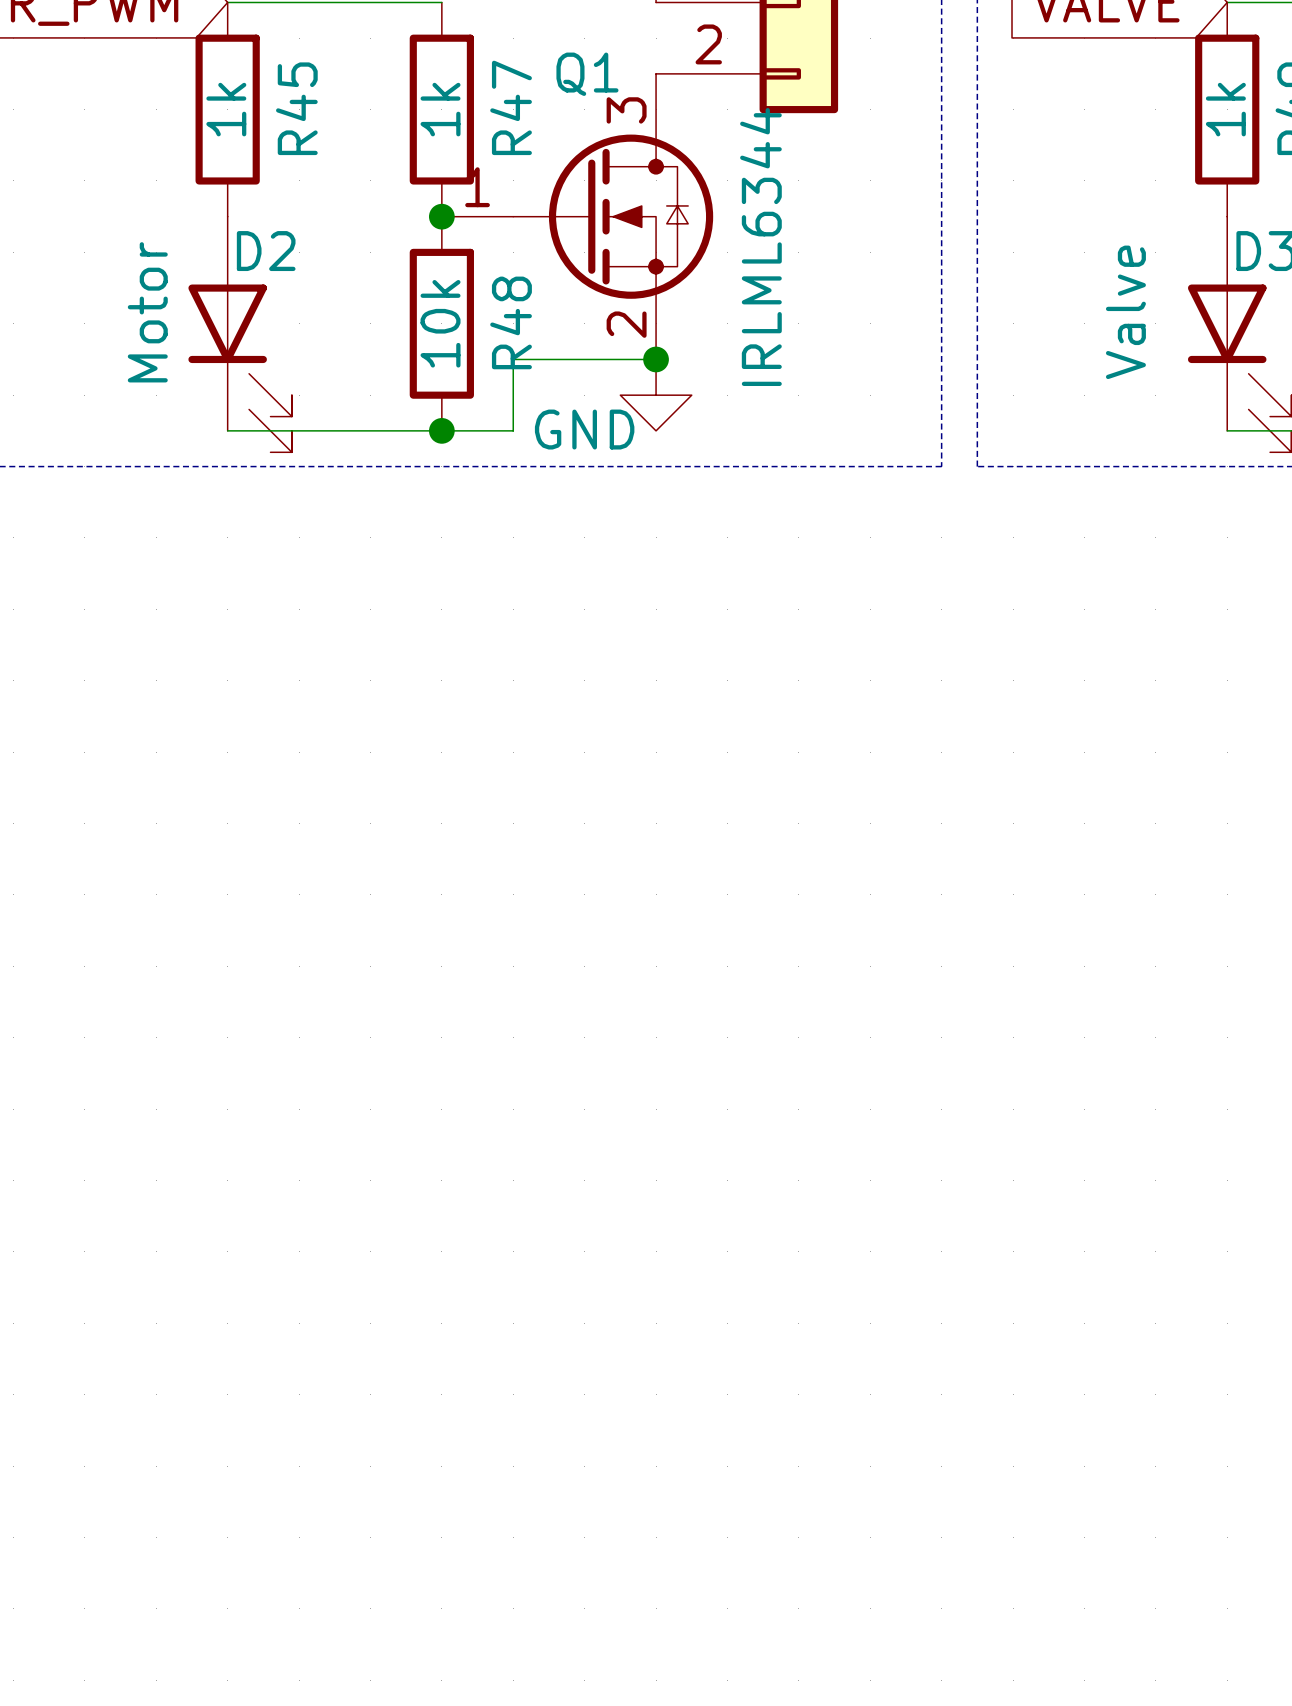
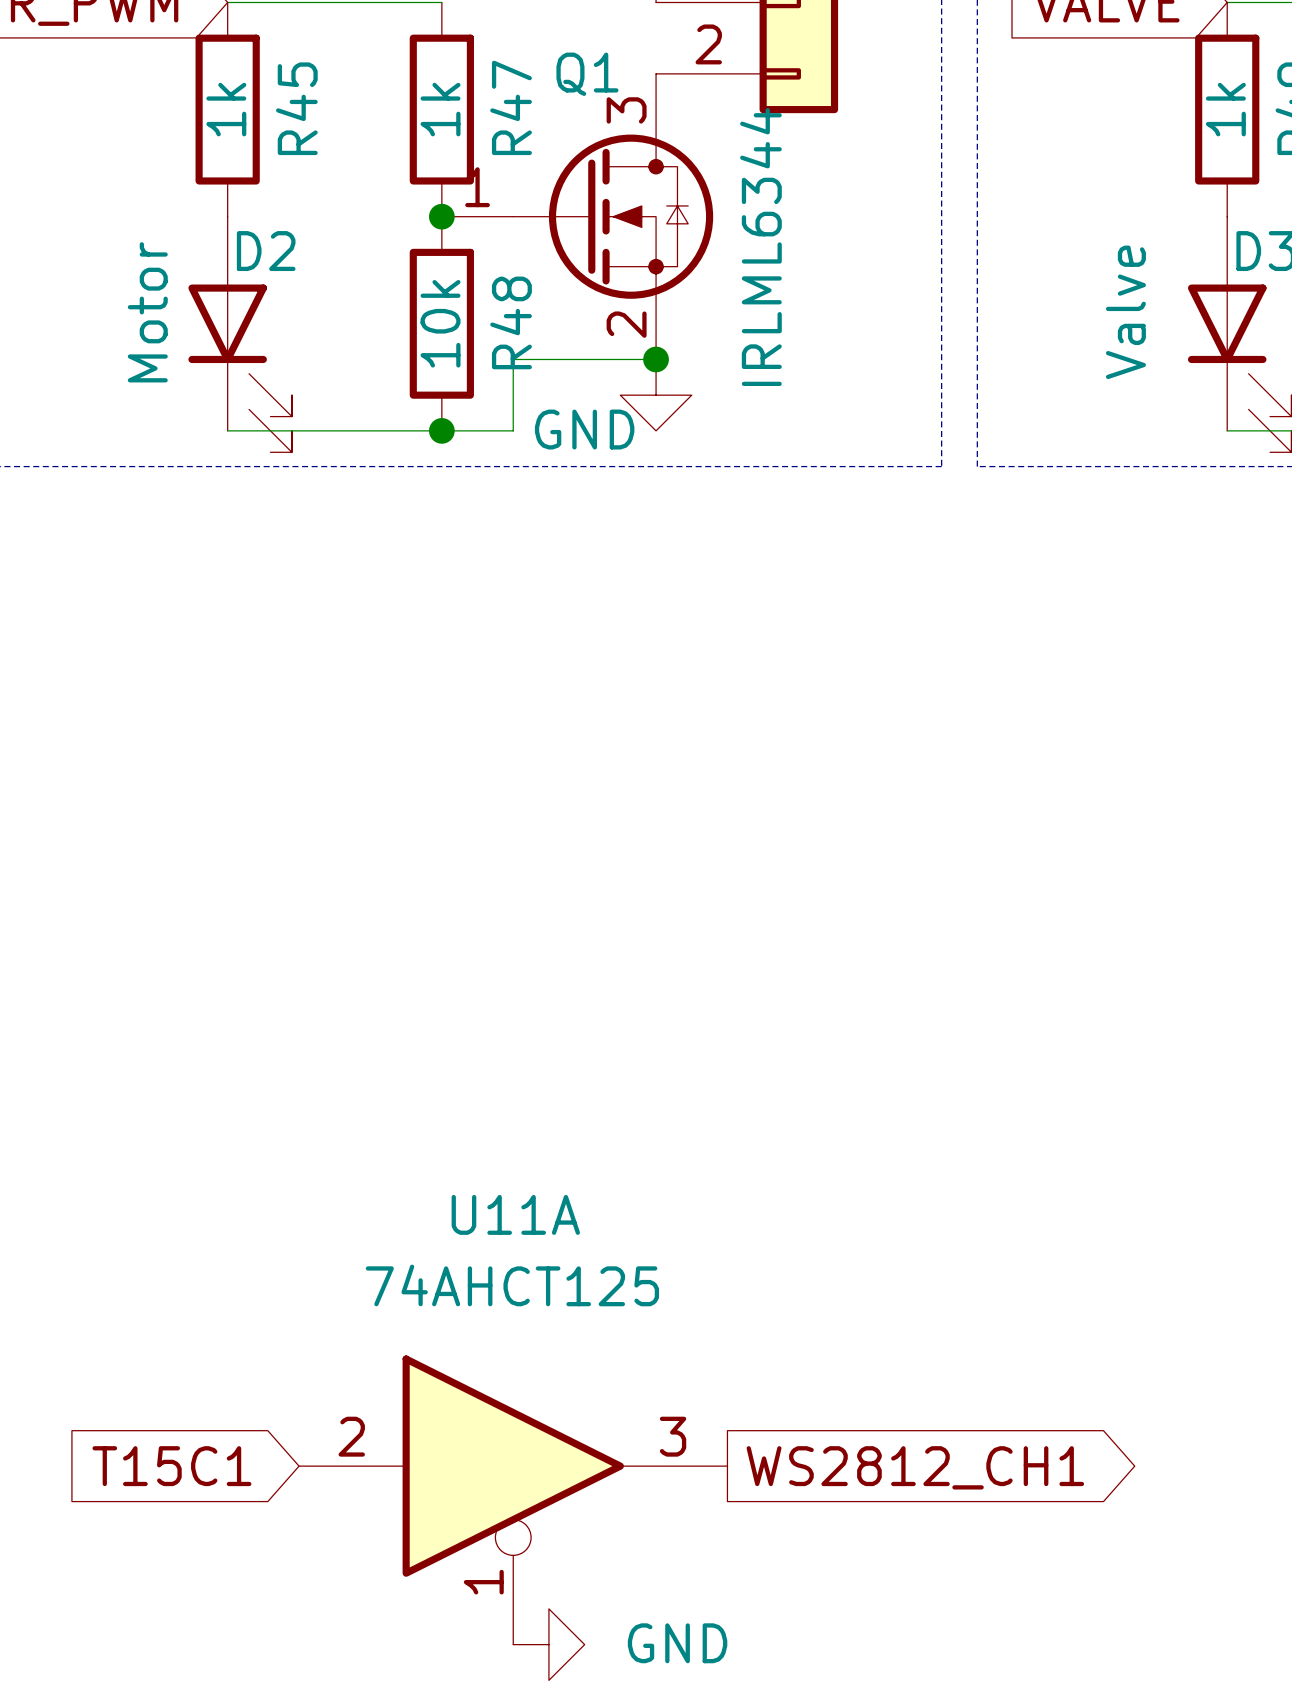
global label: none -> T15C1 (171, 1466)
global label: none -> WS2812_CH1 (915, 1467)
U11A: none -> 74AHCT125 (513, 1500)
power symbol: none -> GND (548, 1644)

